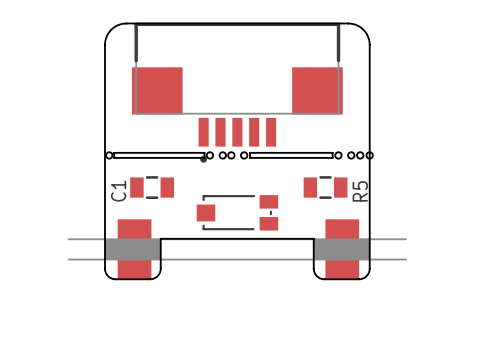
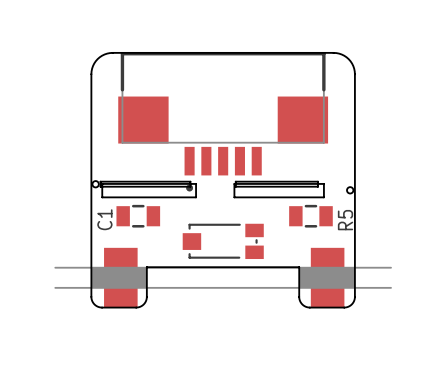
board edge: none -> (102, 183) (102, 197) (196, 197) (196, 183) (102, 183)
hole: (209, 155) -> none
hole: (222, 155) -> none
hole: (231, 155) -> none
hole: (244, 155) -> none
board edge: none -> (234, 183) (234, 197) (323, 197) (323, 183) (234, 183)
hole: (338, 155) -> none
hole: (351, 155) -> none
hole: (360, 155) -> none
hole: (369, 155) -> none
hole: none -> (350, 190)

